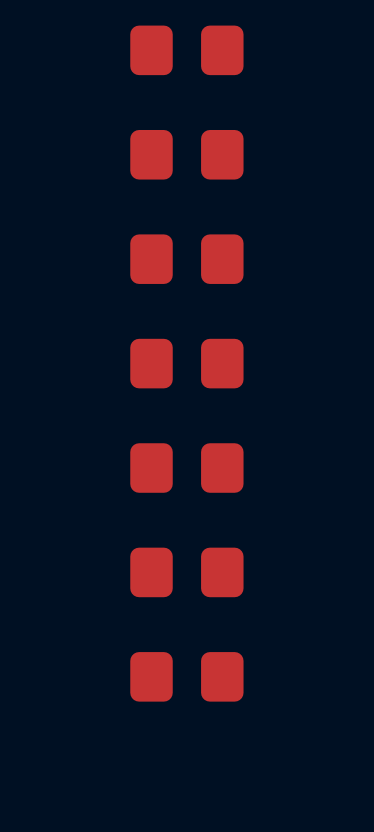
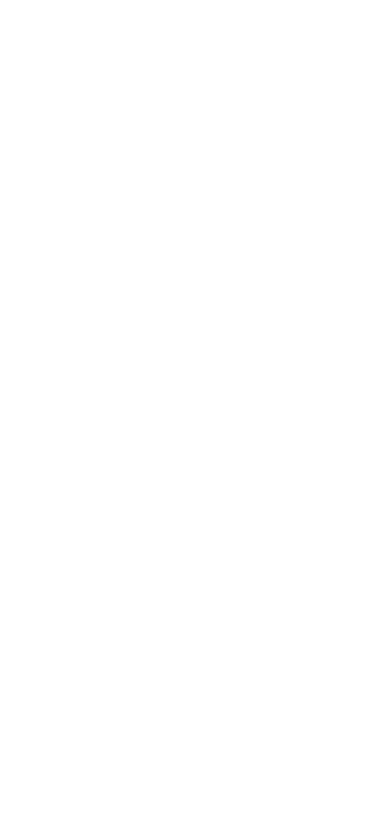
part: (186, 50) -> none
part: (186, 154) -> none
part: (186, 259) -> none
part: (186, 363) -> none
part: (186, 468) -> none
part: (186, 572) -> none
part: (186, 676) -> none

